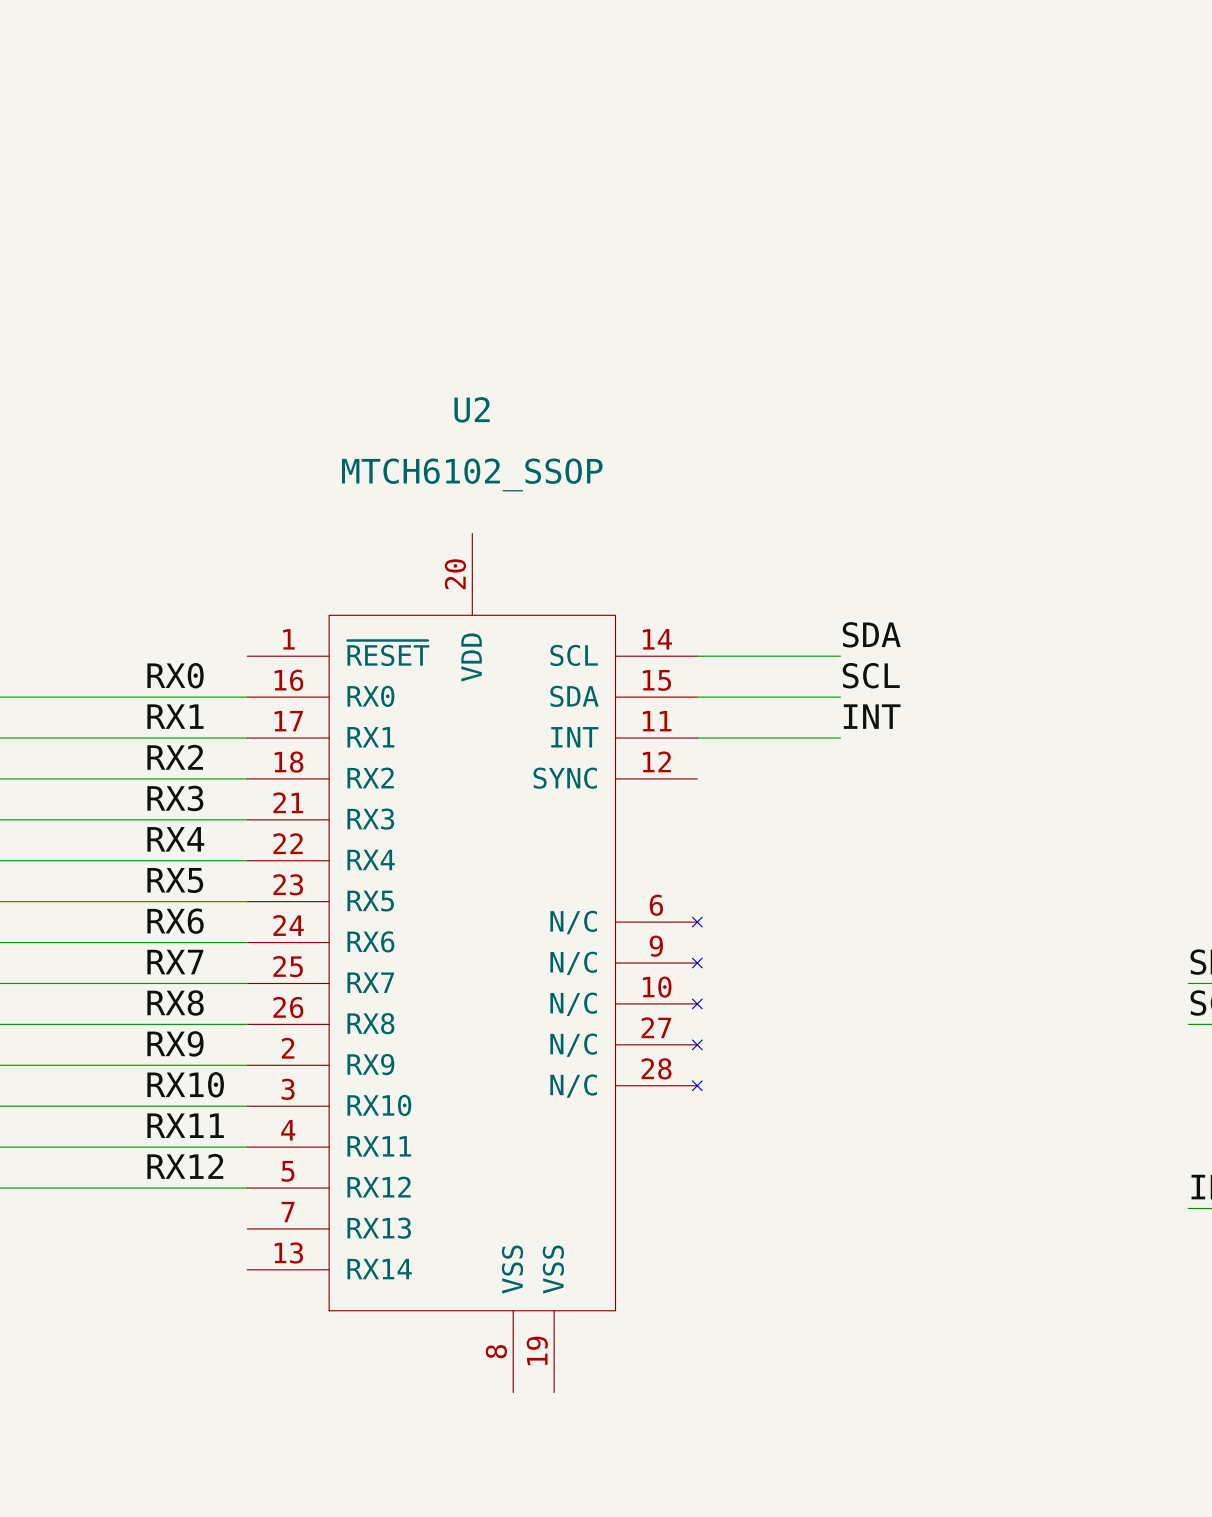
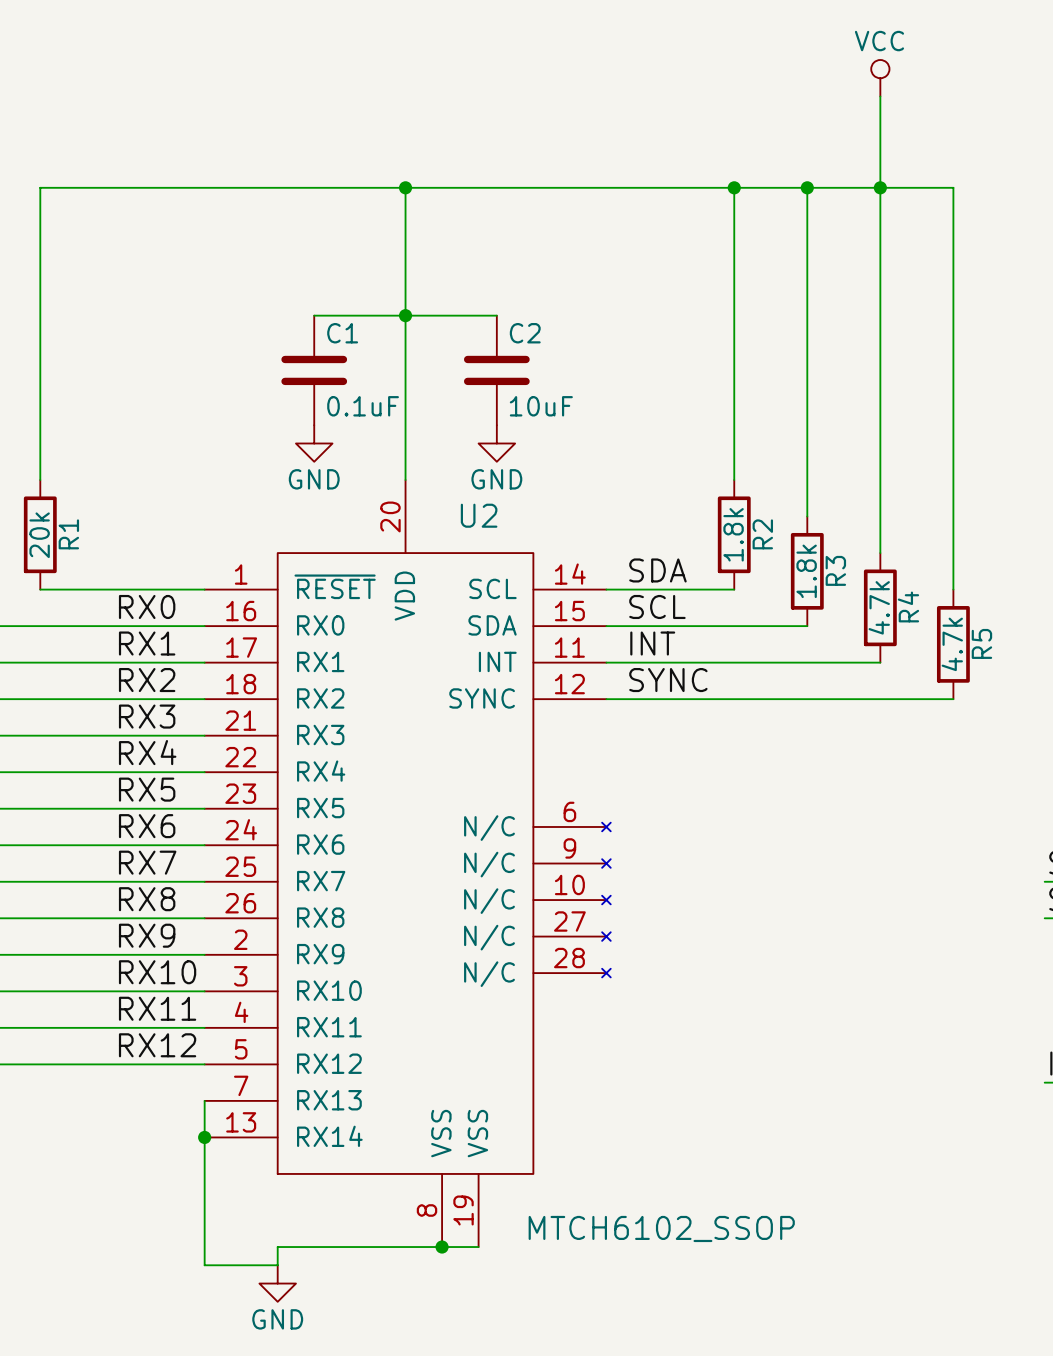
power symbol: none -> VCC (880, 78)
wire: none -> (880, 96) (880, 553)
wire: none -> (405, 187) (405, 480)
junction: none -> (405, 187)
wire: none -> (734, 187) (734, 480)
junction: none -> (734, 187)
wire: none -> (807, 187) (807, 516)
junction: none -> (807, 187)
junction: none -> (880, 187)
wire: none -> (314, 315) (496, 315)
junction: none -> (405, 315)
U2 name position: U2 (472, 409) -> U2 (479, 515)
C1: none -> 0.1uF (314, 370)
C2: none -> 10uF (496, 370)
U2 value position: MTCH6102_SSOP (472, 474) -> MTCH6102_SSOP (661, 1228)
power symbol: none -> GND (314, 443)
power symbol: none -> GND (496, 443)
wire: none -> (40, 480) (40, 187) (953, 187) (953, 589)
R1: none -> 20k (40, 534)
R2: none -> 1.8k (734, 534)
label position: SDA (871, 634) -> SDA (657, 570)
R3: none -> 1.8k (807, 571)
wire: none -> (40, 589) (204, 589)
label position: SCL (871, 675) -> SCL (657, 606)
R4: none -> 4.7k (880, 607)
wire: none -> (734, 626) (807, 626)
label position: INT (872, 716) -> INT (652, 643)
R5: none -> 4.7k (953, 644)
wire: none -> (734, 662) (880, 662)
label: none -> SYNC (668, 680)
wire: none -> (606, 699) (953, 699)
wire: none -> (204, 1100) (204, 1265) (277, 1265) (277, 1247) (478, 1247)
junction: none -> (204, 1137)
junction: none -> (442, 1247)
power symbol: none -> GND (277, 1283)

